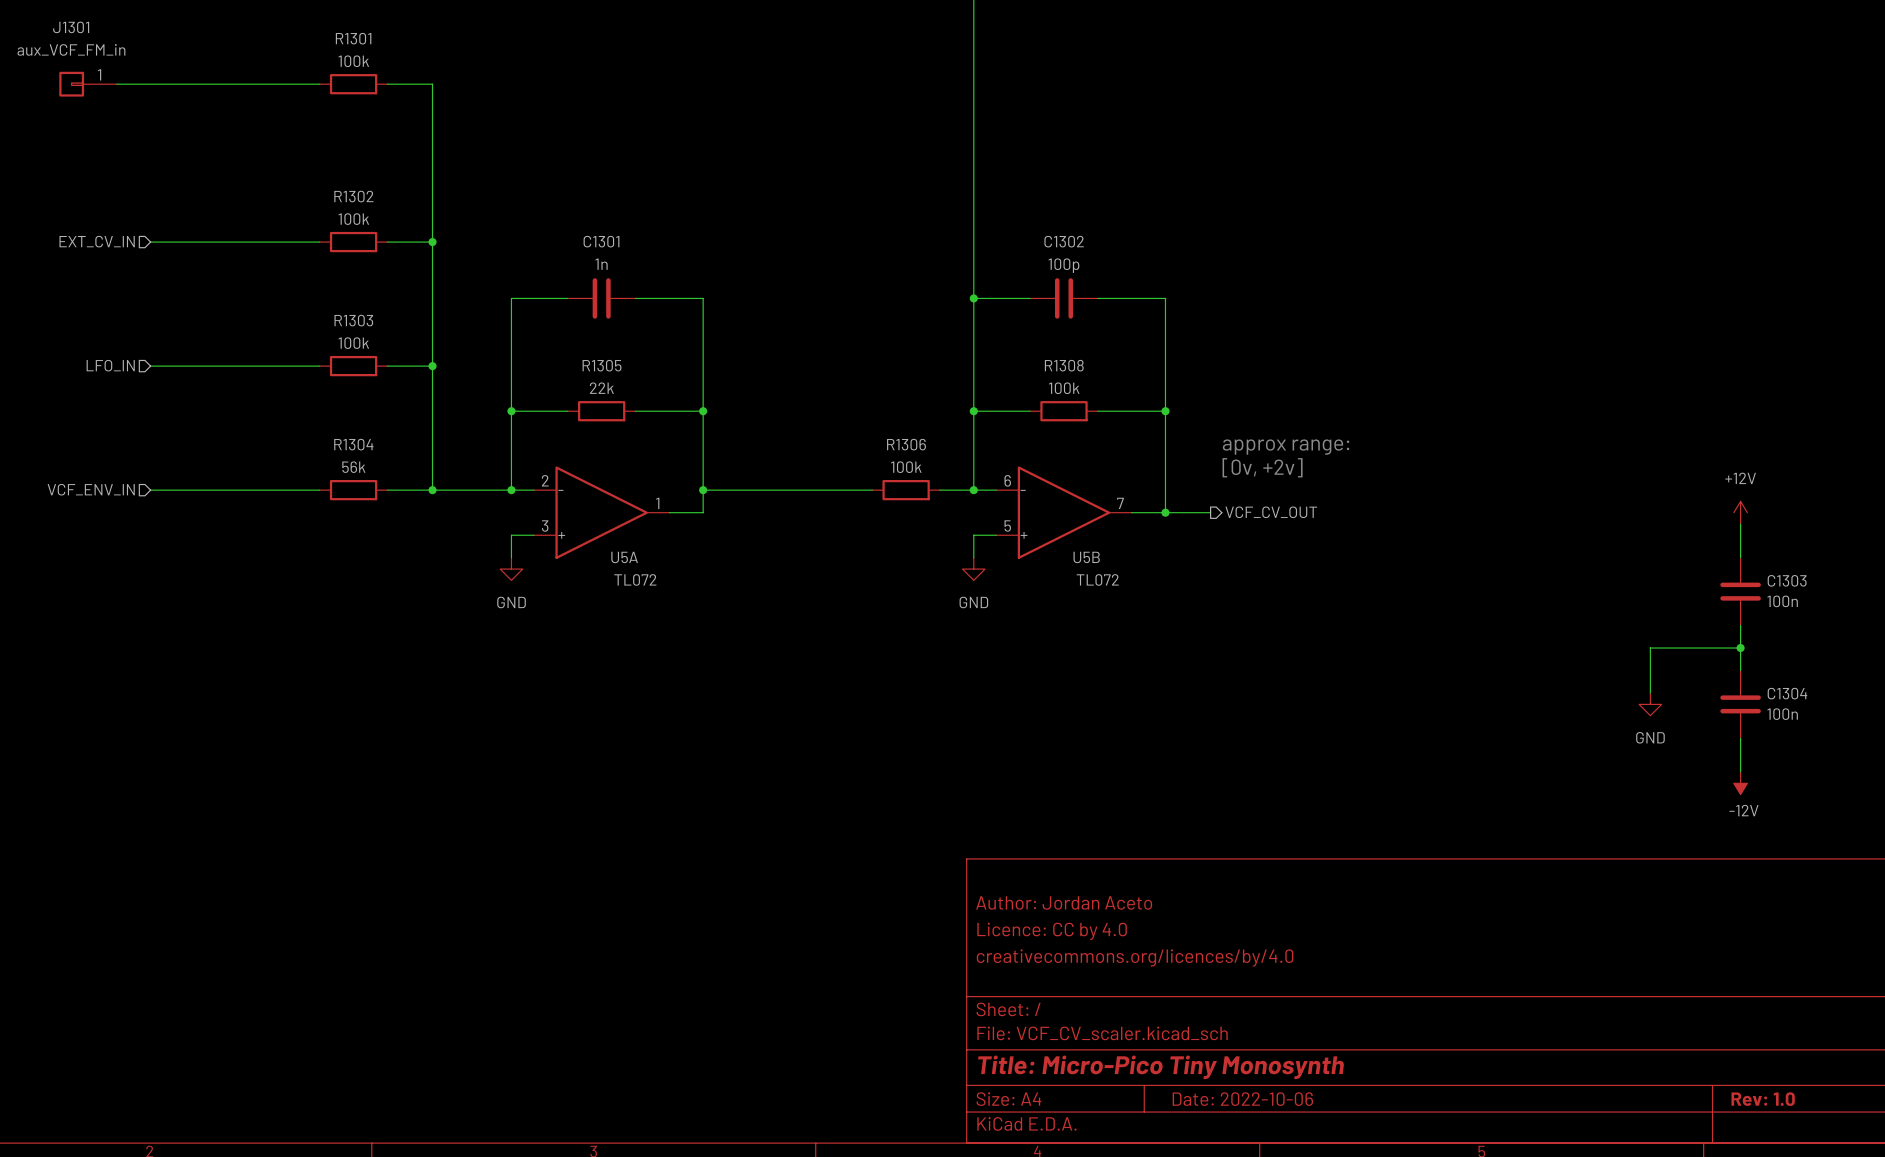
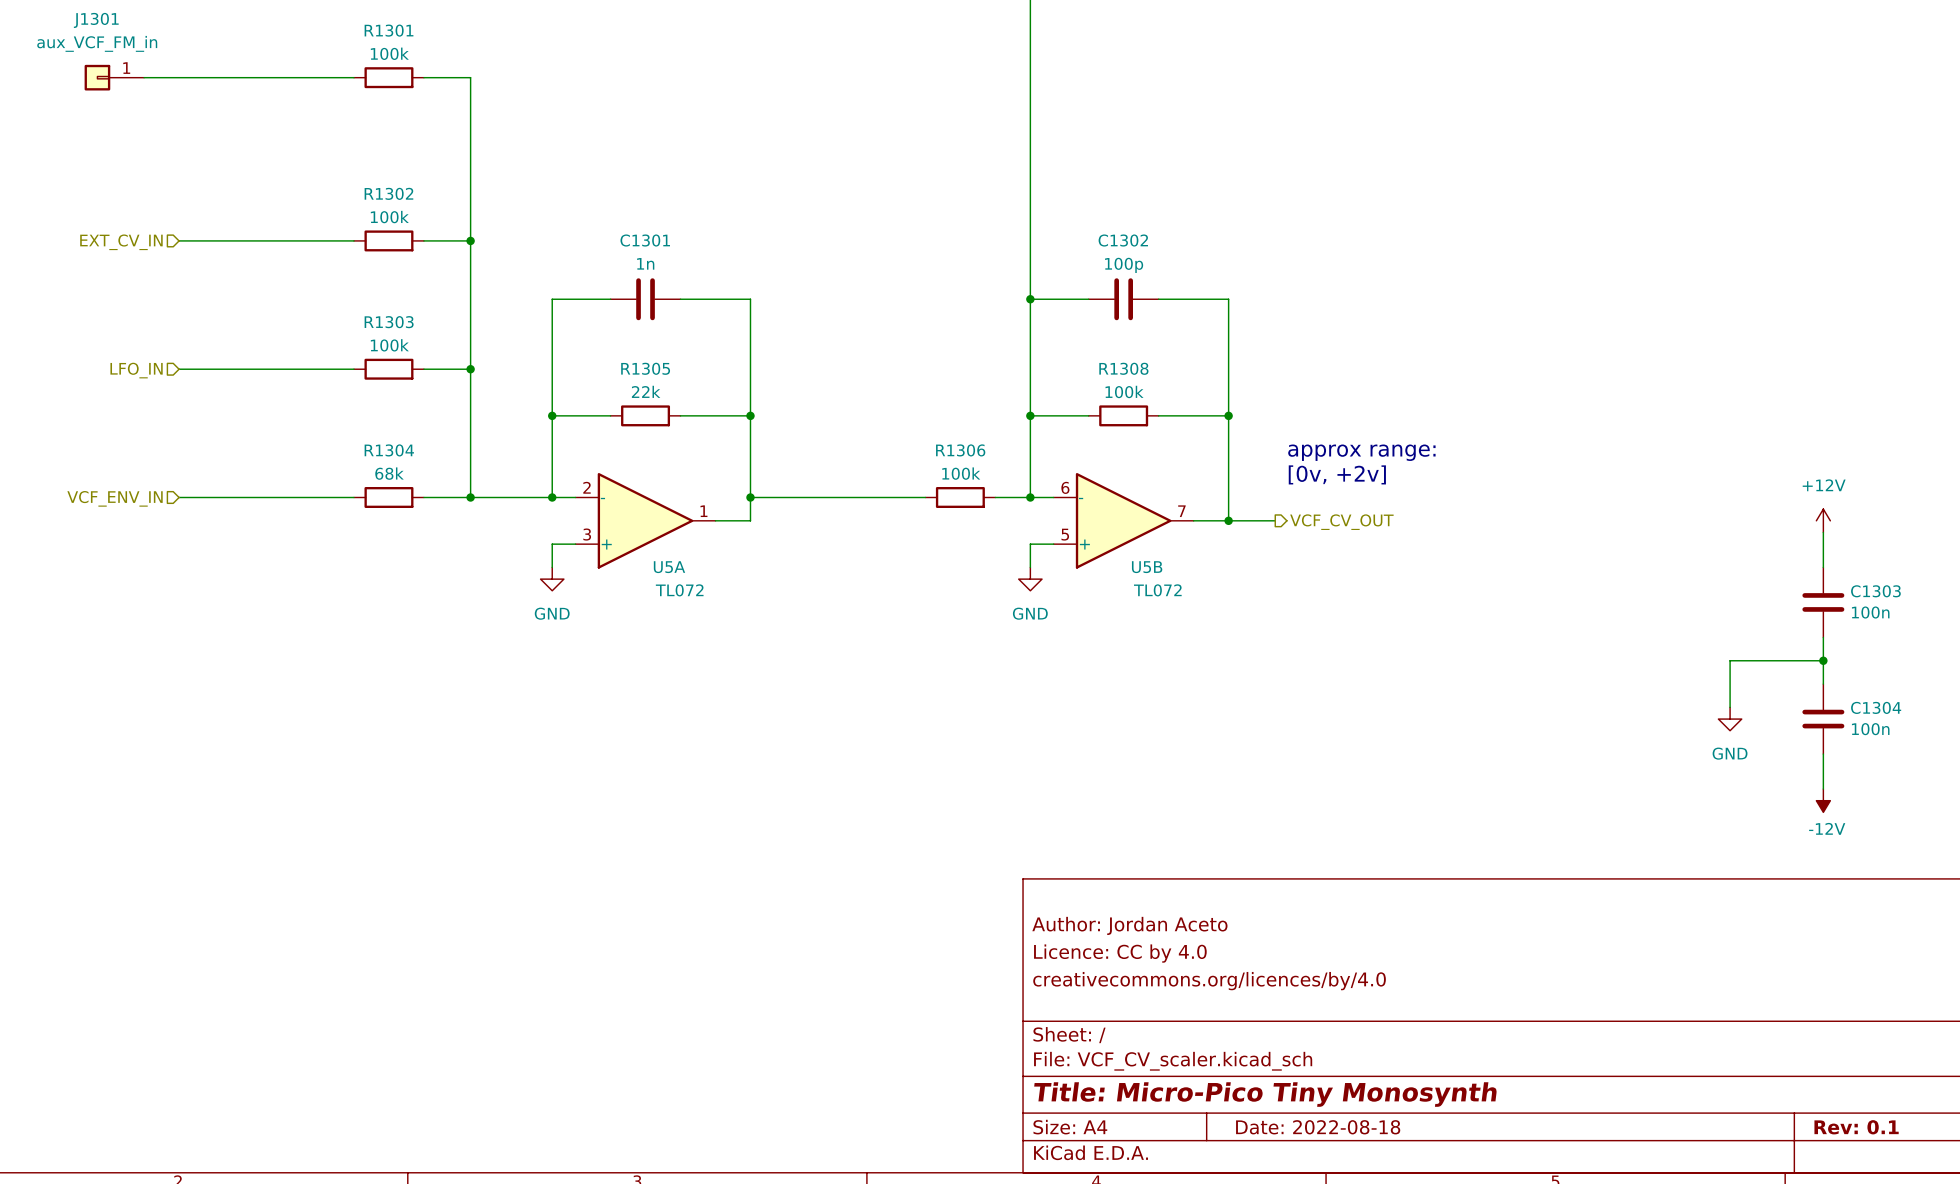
R1304 value: 56k (353, 467) -> 68k (389, 473)
title block: Date: 2022-10-06 (1242, 1099) -> Date: 2022-08-18 (1318, 1127)
title block: Rev: 1.0 (1763, 1099) -> Rev: 0.1 (1856, 1127)

